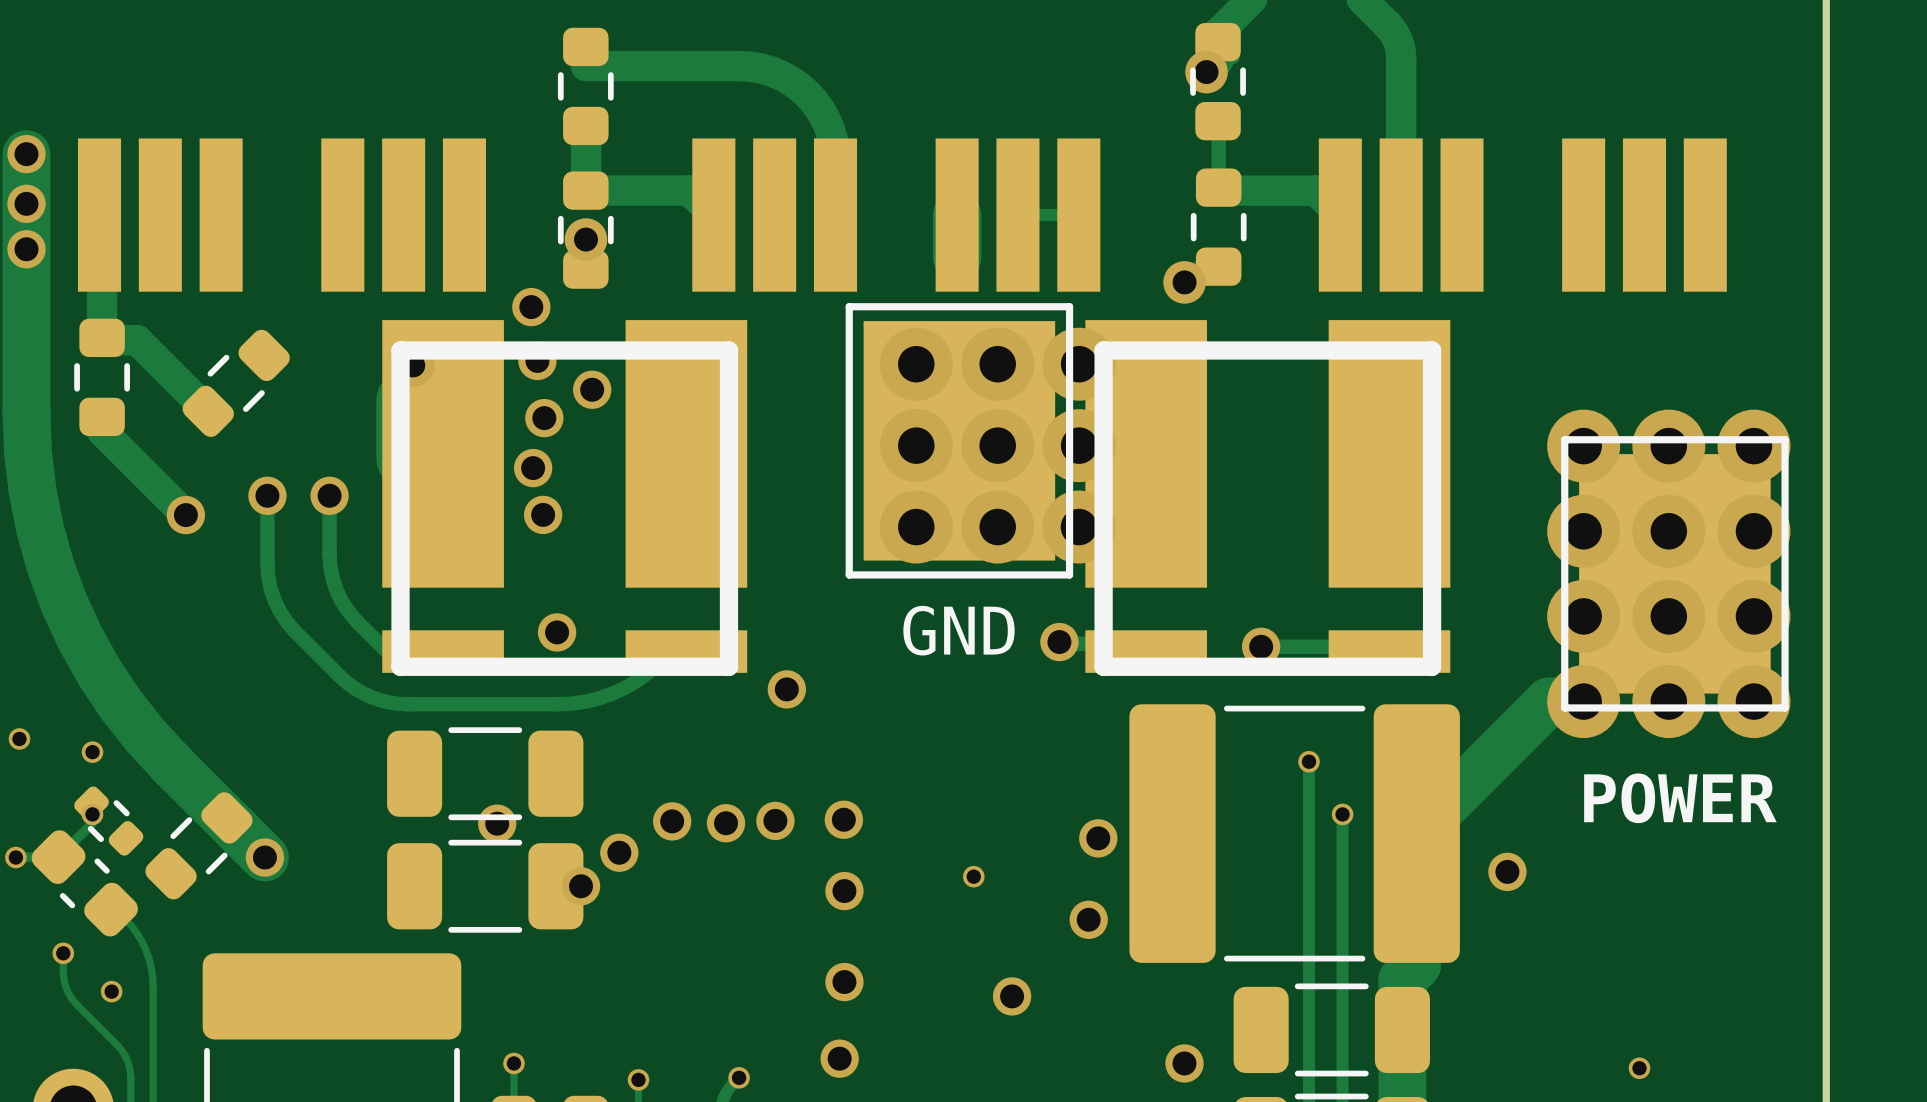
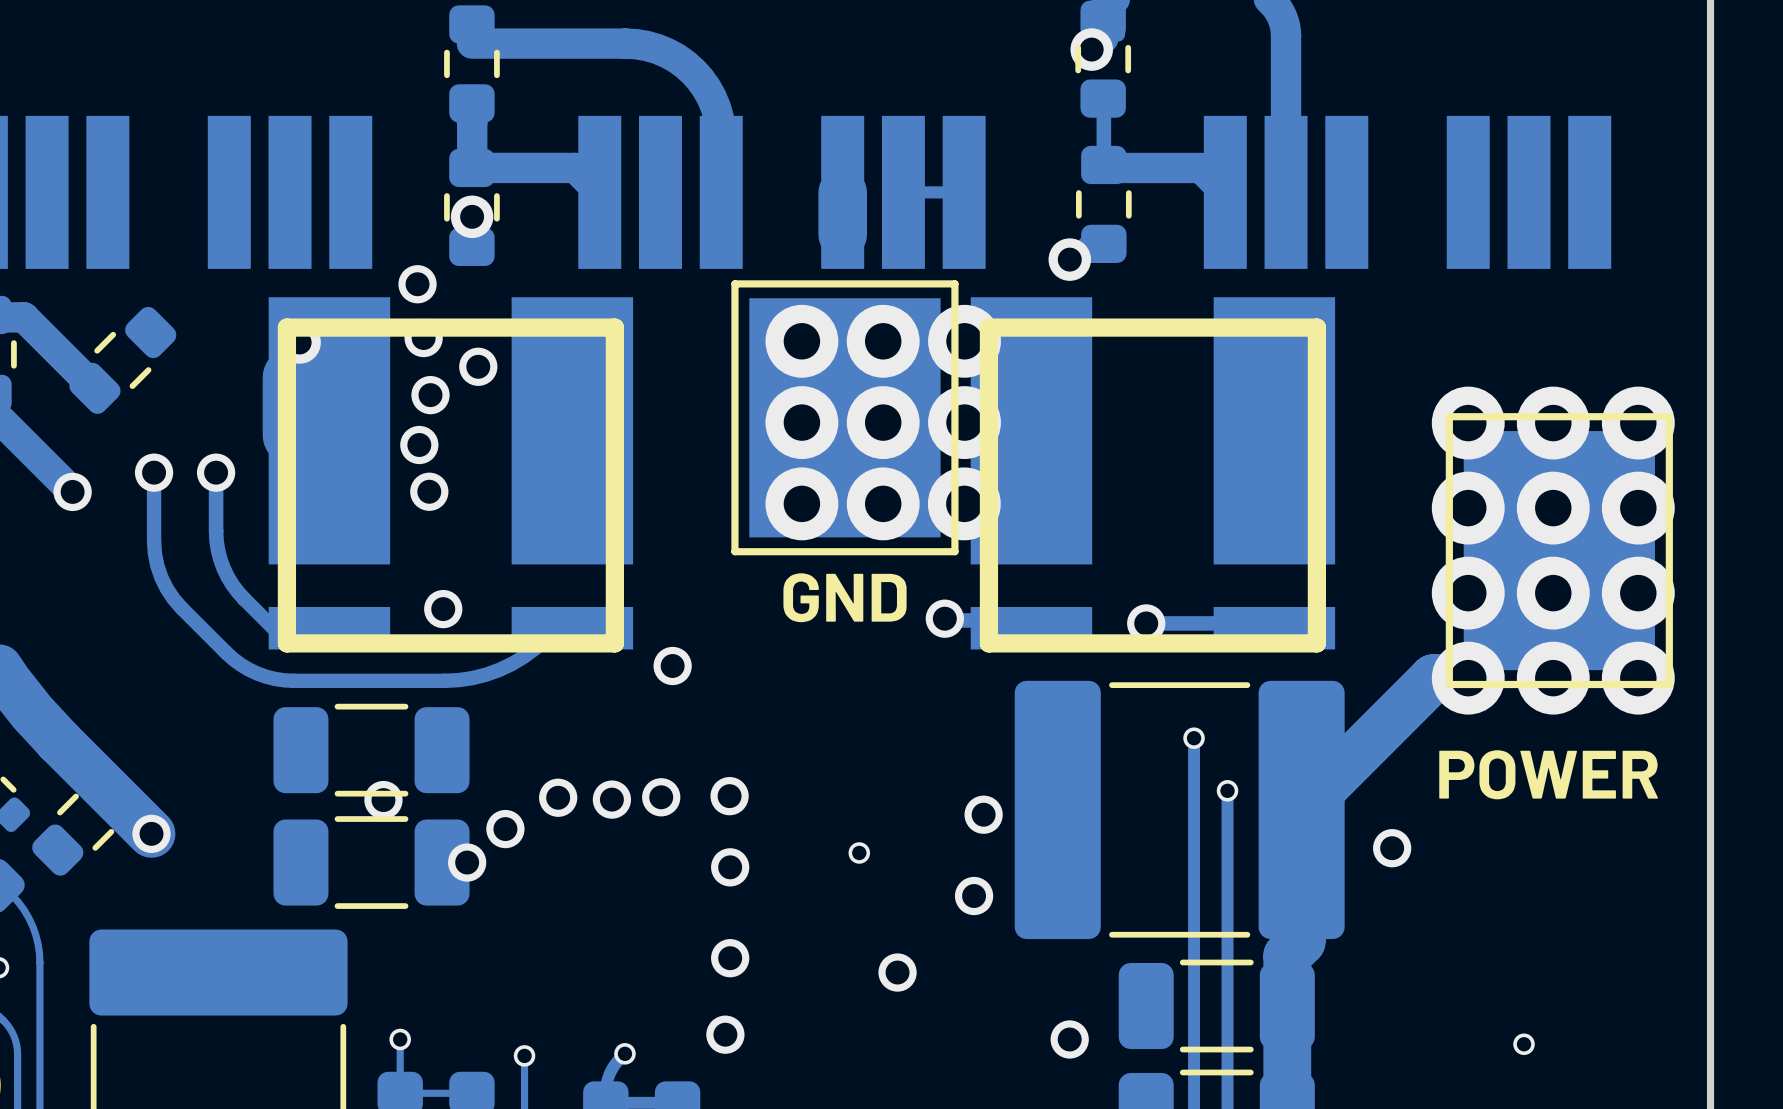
text: none -> GND (845, 597)
GND name: GND (959, 630) -> none
text: none -> POWER (1548, 774)
POWER name: POWER (1680, 798) -> none

